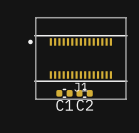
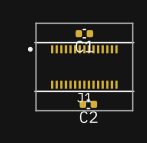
C1 position: (64, 93) -> (84, 33)

